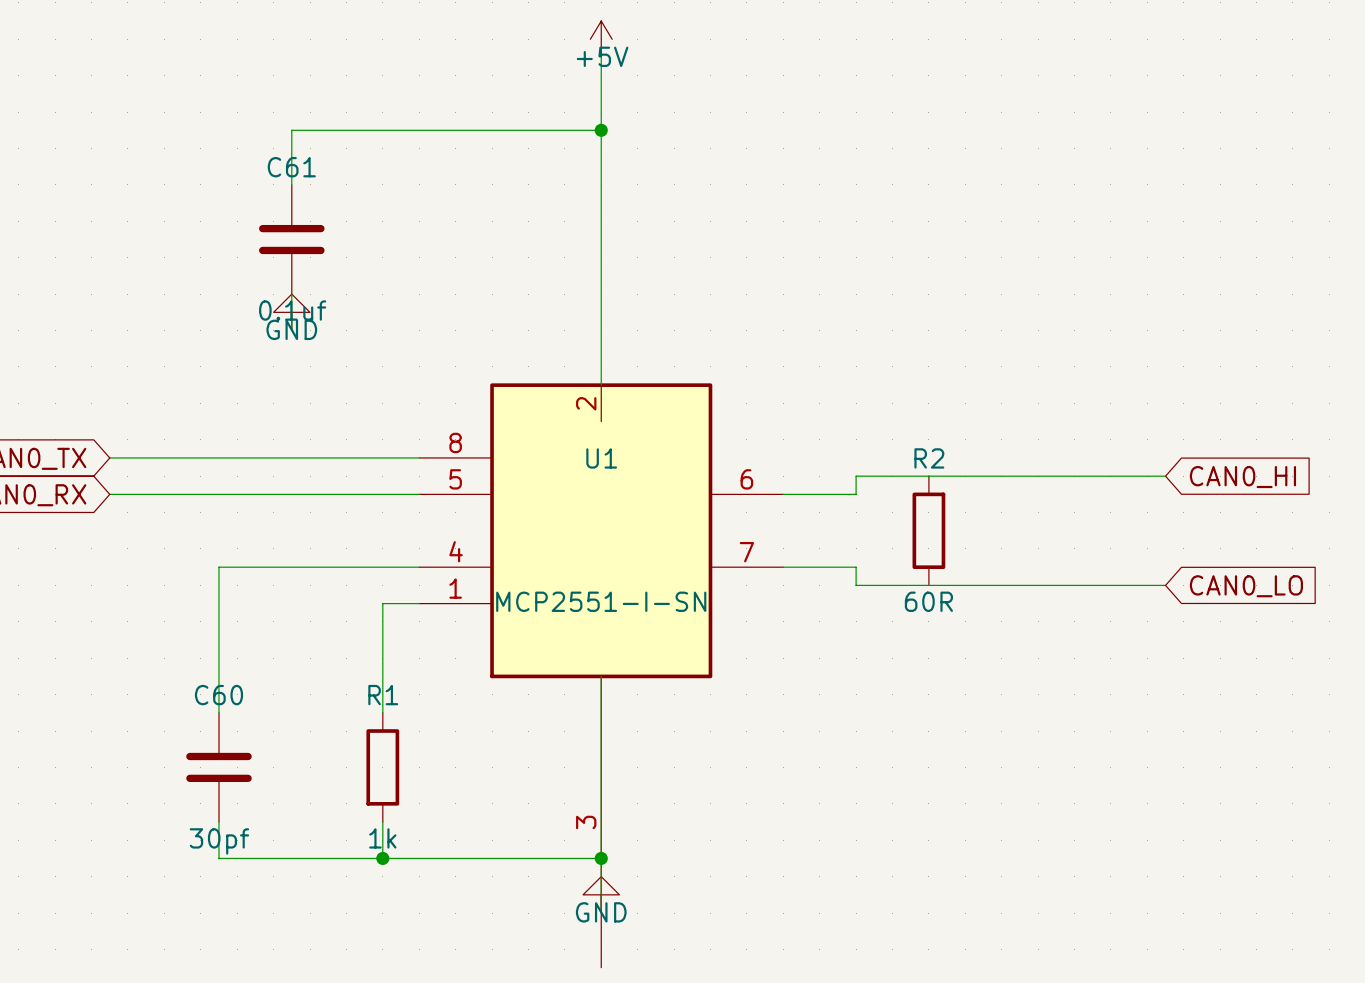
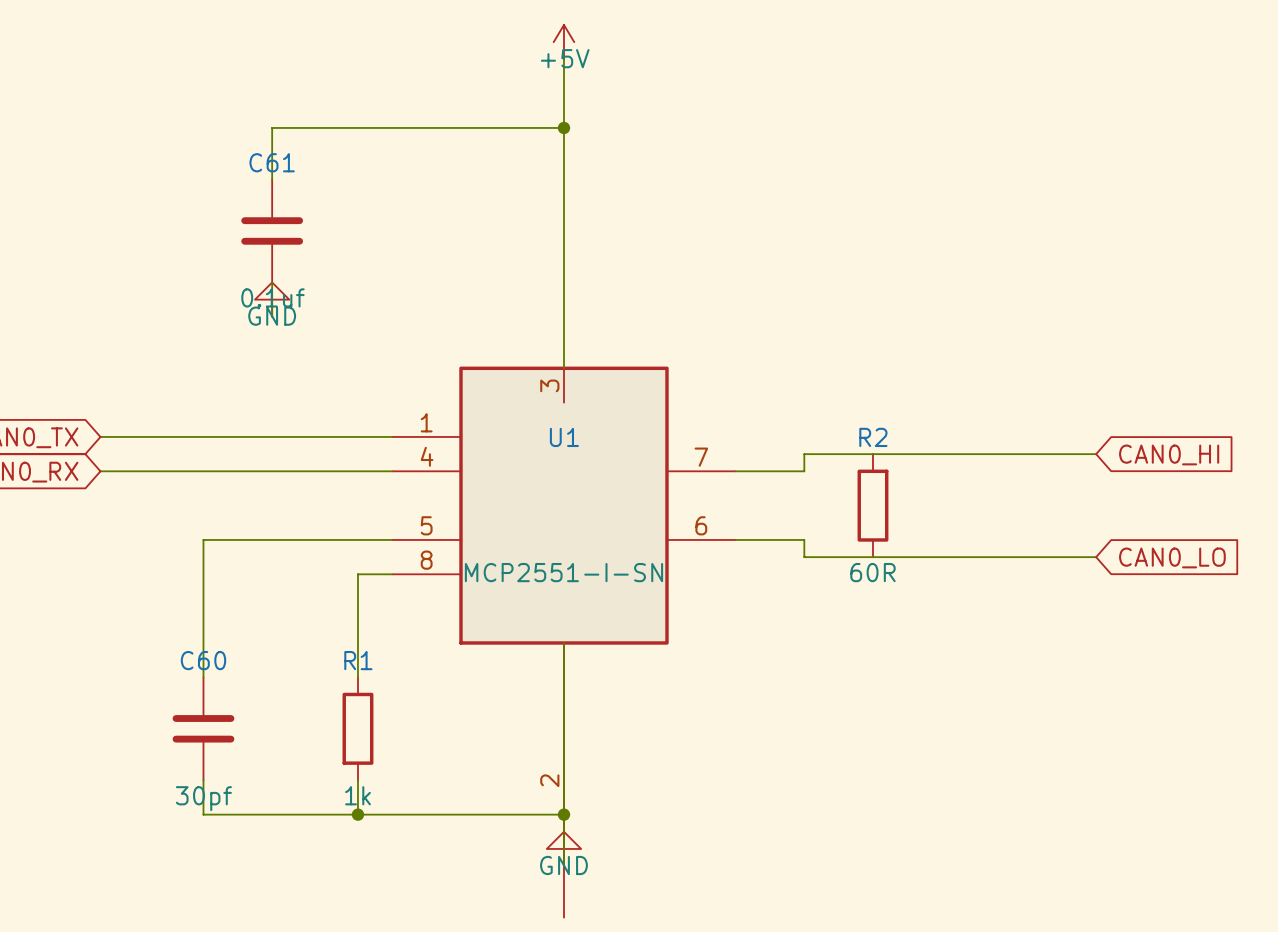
U1 pin number: 2 (586, 403) -> 3 (549, 385)
U1 pin number: 8 (455, 442) -> 1 (426, 422)
U1 pin number: 5 (455, 479) -> 4 (427, 456)
U1 pin number: 6 (746, 479) -> 7 (701, 457)
U1 pin number: 4 (456, 551) -> 5 (426, 525)
U1 pin number: 7 (746, 552) -> 6 (701, 525)
U1 pin number: 1 (455, 588) -> 8 (426, 560)
U1 pin number: 3 (586, 822) -> 2 (549, 780)

